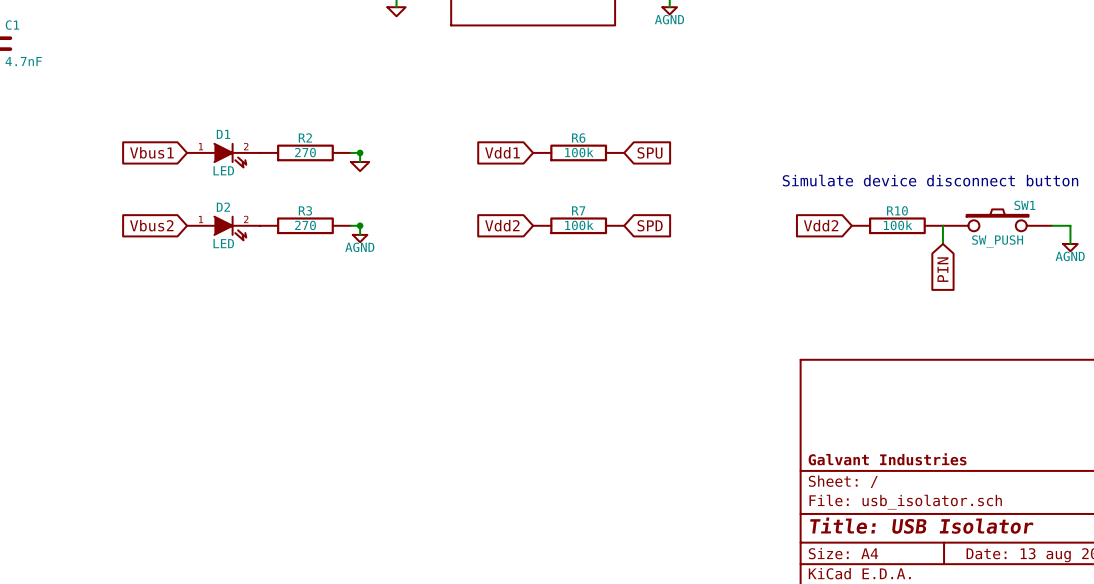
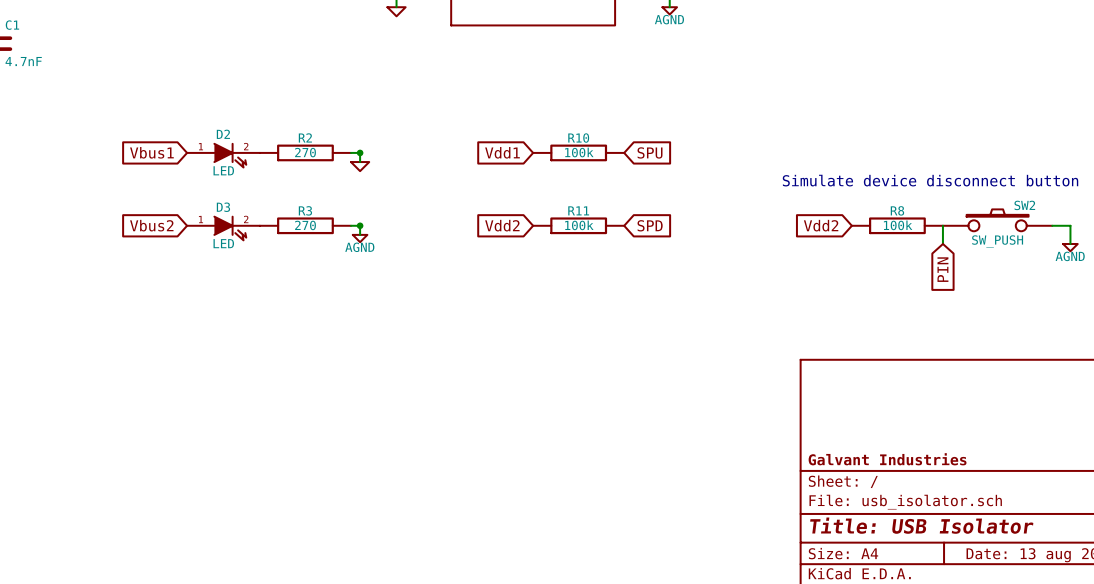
D1 name: D1 (223, 134) -> D2 (223, 134)
R6 name: R6 (578, 138) -> R10 (578, 138)
SW1 name: SW1 (1024, 205) -> SW2 (1024, 205)
D2 name: D2 (223, 207) -> D3 (223, 207)
R7 name: R7 (578, 210) -> R11 (578, 210)
R10 name: R10 (897, 210) -> R8 (897, 210)

